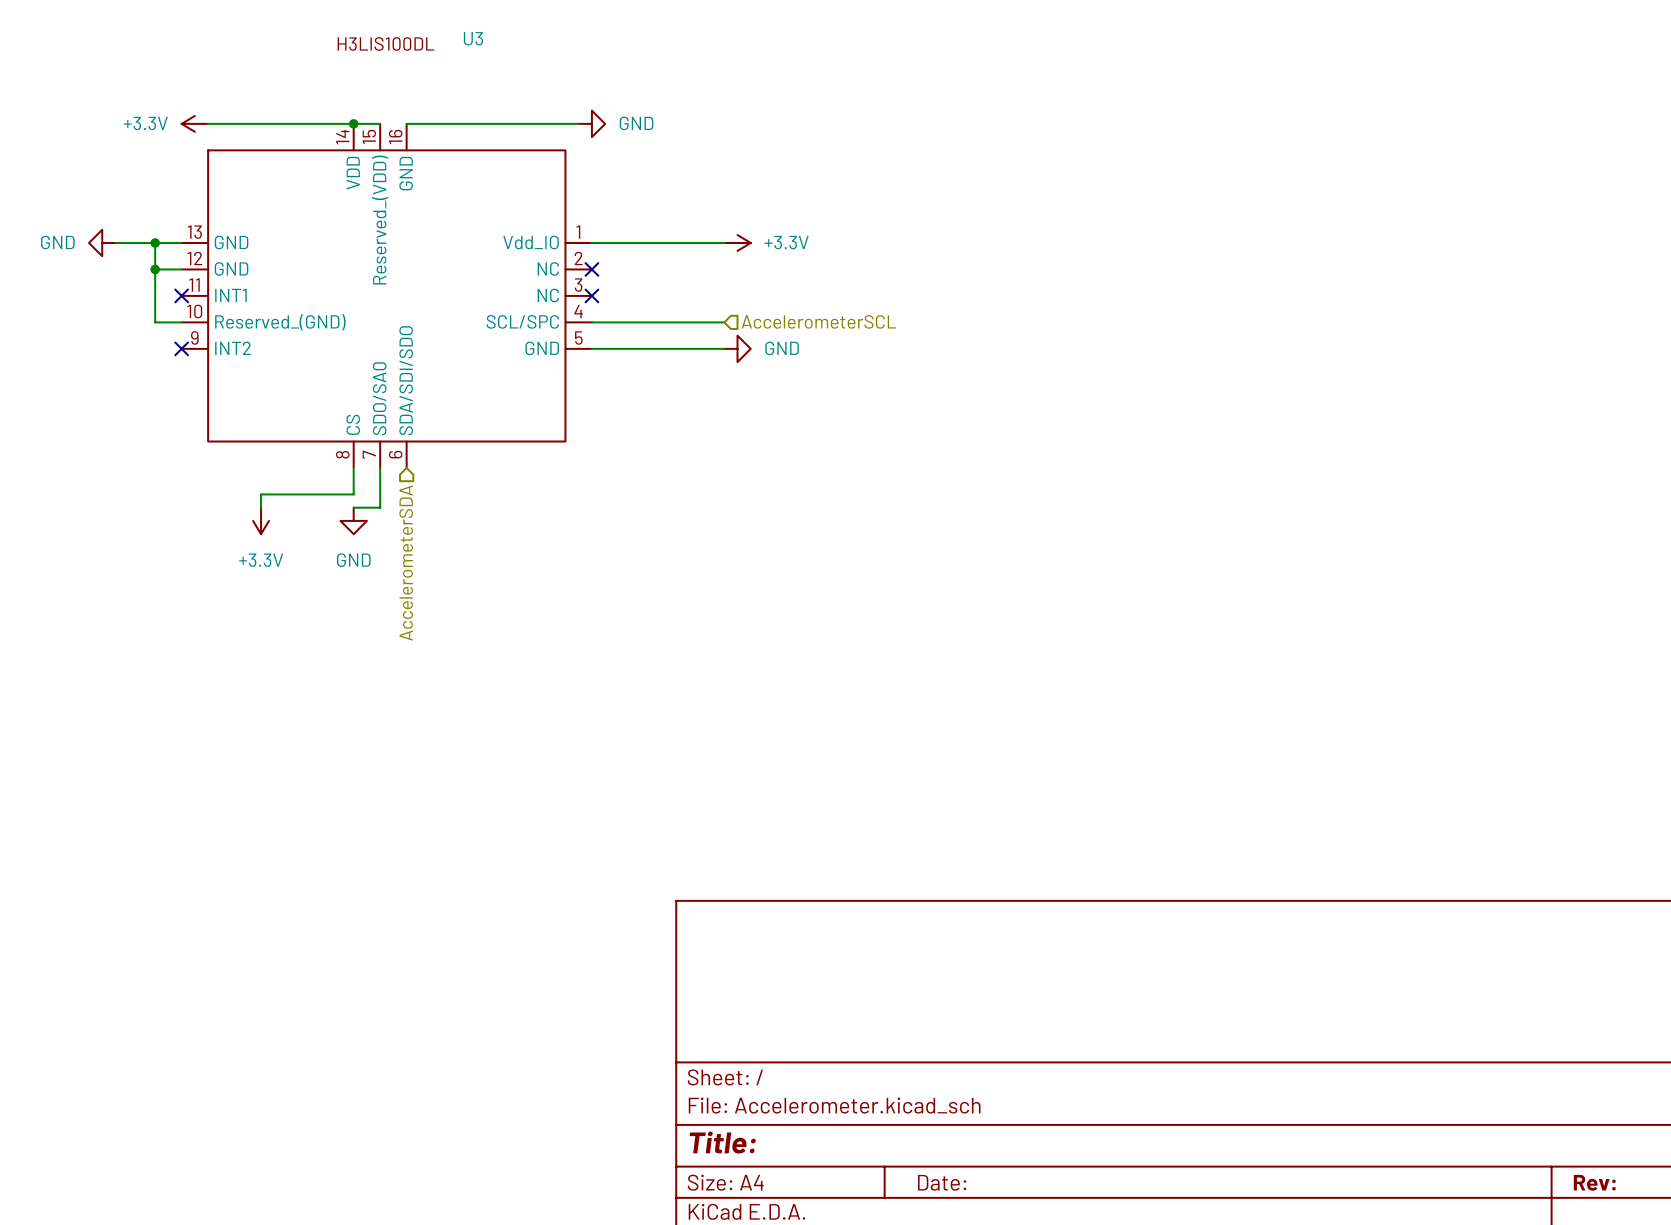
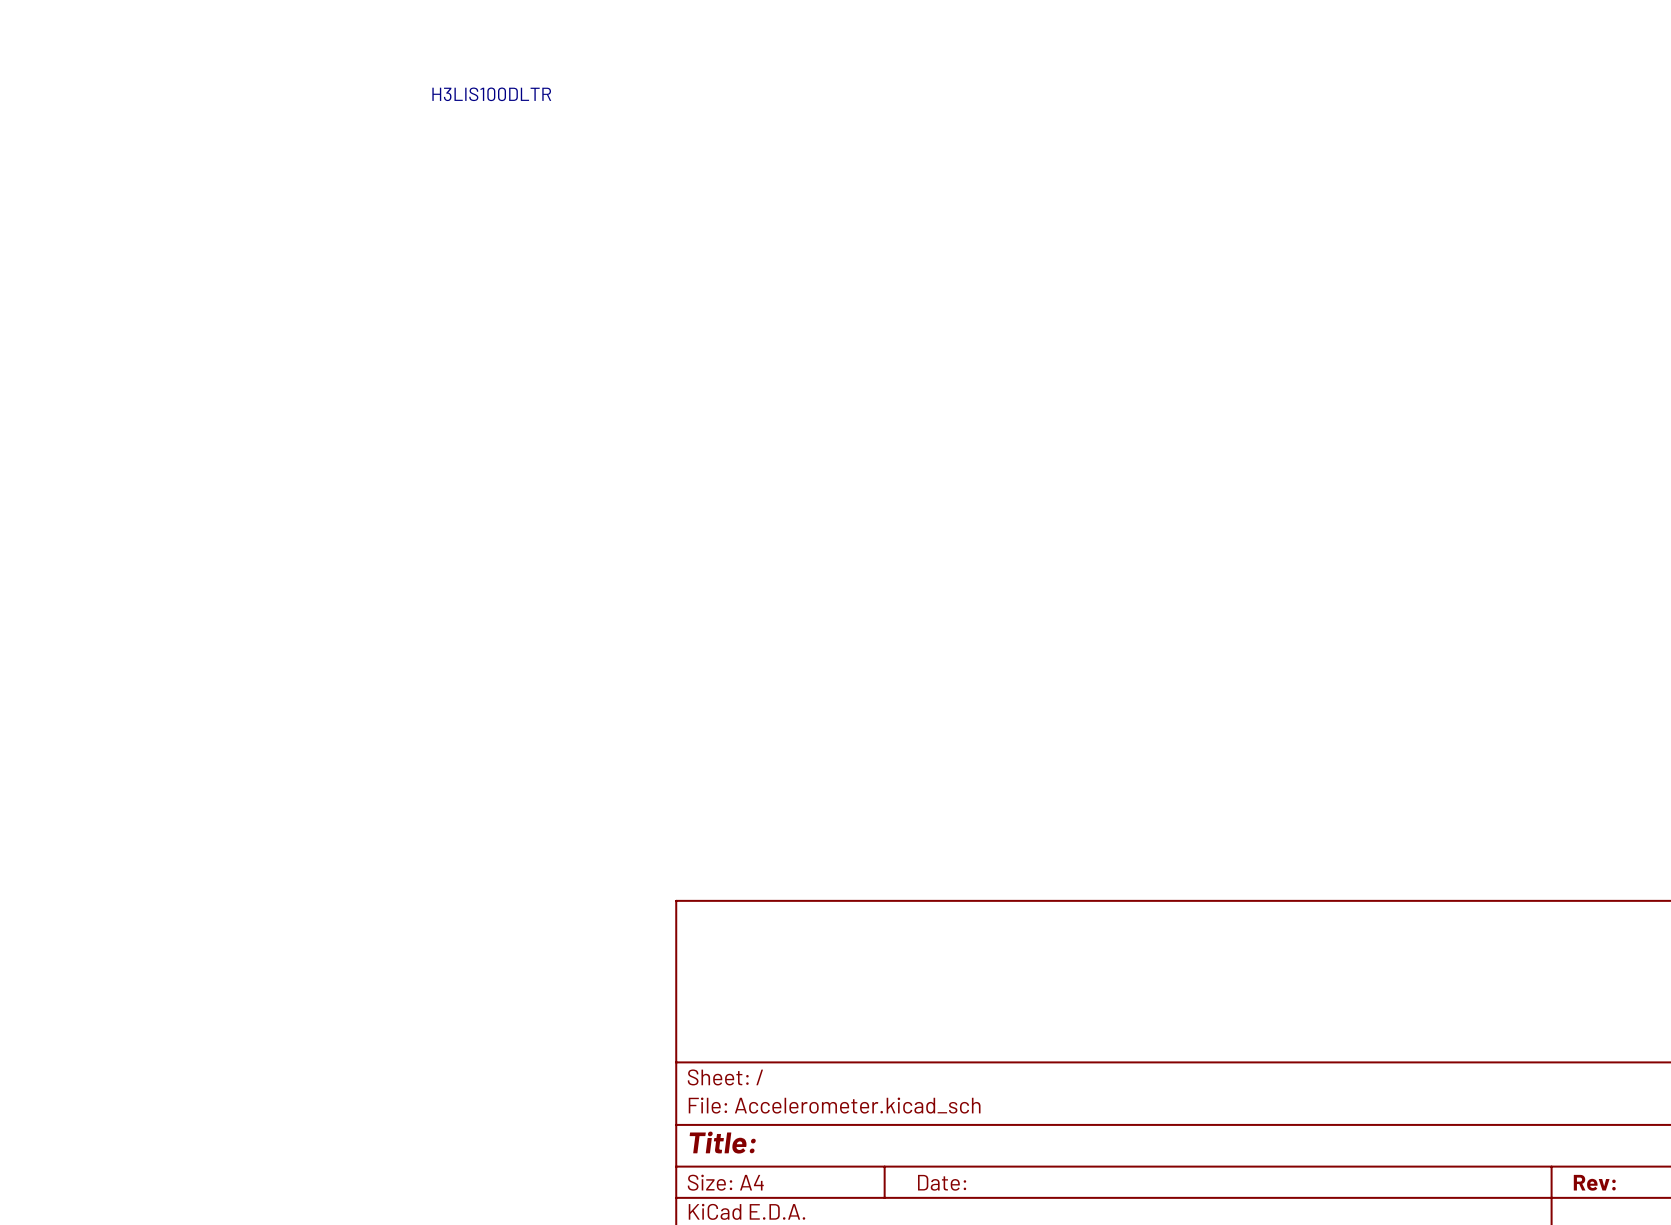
text: none -> H3LIS100DLTR (491, 94)
power symbol: +3.3V (194, 123) -> none
wire: (208, 123) (380, 123) -> none
junction: (353, 123) -> none
wire: (406, 123) (578, 123) -> none
power symbol: GND (591, 123) -> none
power symbol: GND (102, 242) -> none
wire: (115, 242) (181, 242) -> none
wire: (155, 242) (155, 322) (181, 322) -> none
junction: (155, 242) -> none
wire: (591, 242) (724, 242) -> none
power symbol: +3.3V (737, 242) -> none
wire: (155, 269) (181, 269) -> none
junction: (155, 269) -> none
no-connect mark: (591, 269) -> none
no-connect mark: (181, 295) -> none
U3: (386, 295) -> none
no-connect mark: (591, 295) -> none
hierarchical label: AccelerometerSCL (818, 321) -> none
wire: (591, 322) (724, 322) -> none
no-connect mark: (181, 348) -> none
wire: (591, 348) (724, 348) -> none
power symbol: GND (737, 348) -> none
wire: (353, 467) (353, 494) (261, 494) (261, 507) -> none
wire: (380, 467) (380, 507) (353, 507) -> none
power symbol: +3.3V (261, 520) -> none
power symbol: GND (353, 520) -> none
hierarchical label: AccelerometerSDA (406, 563) -> none

